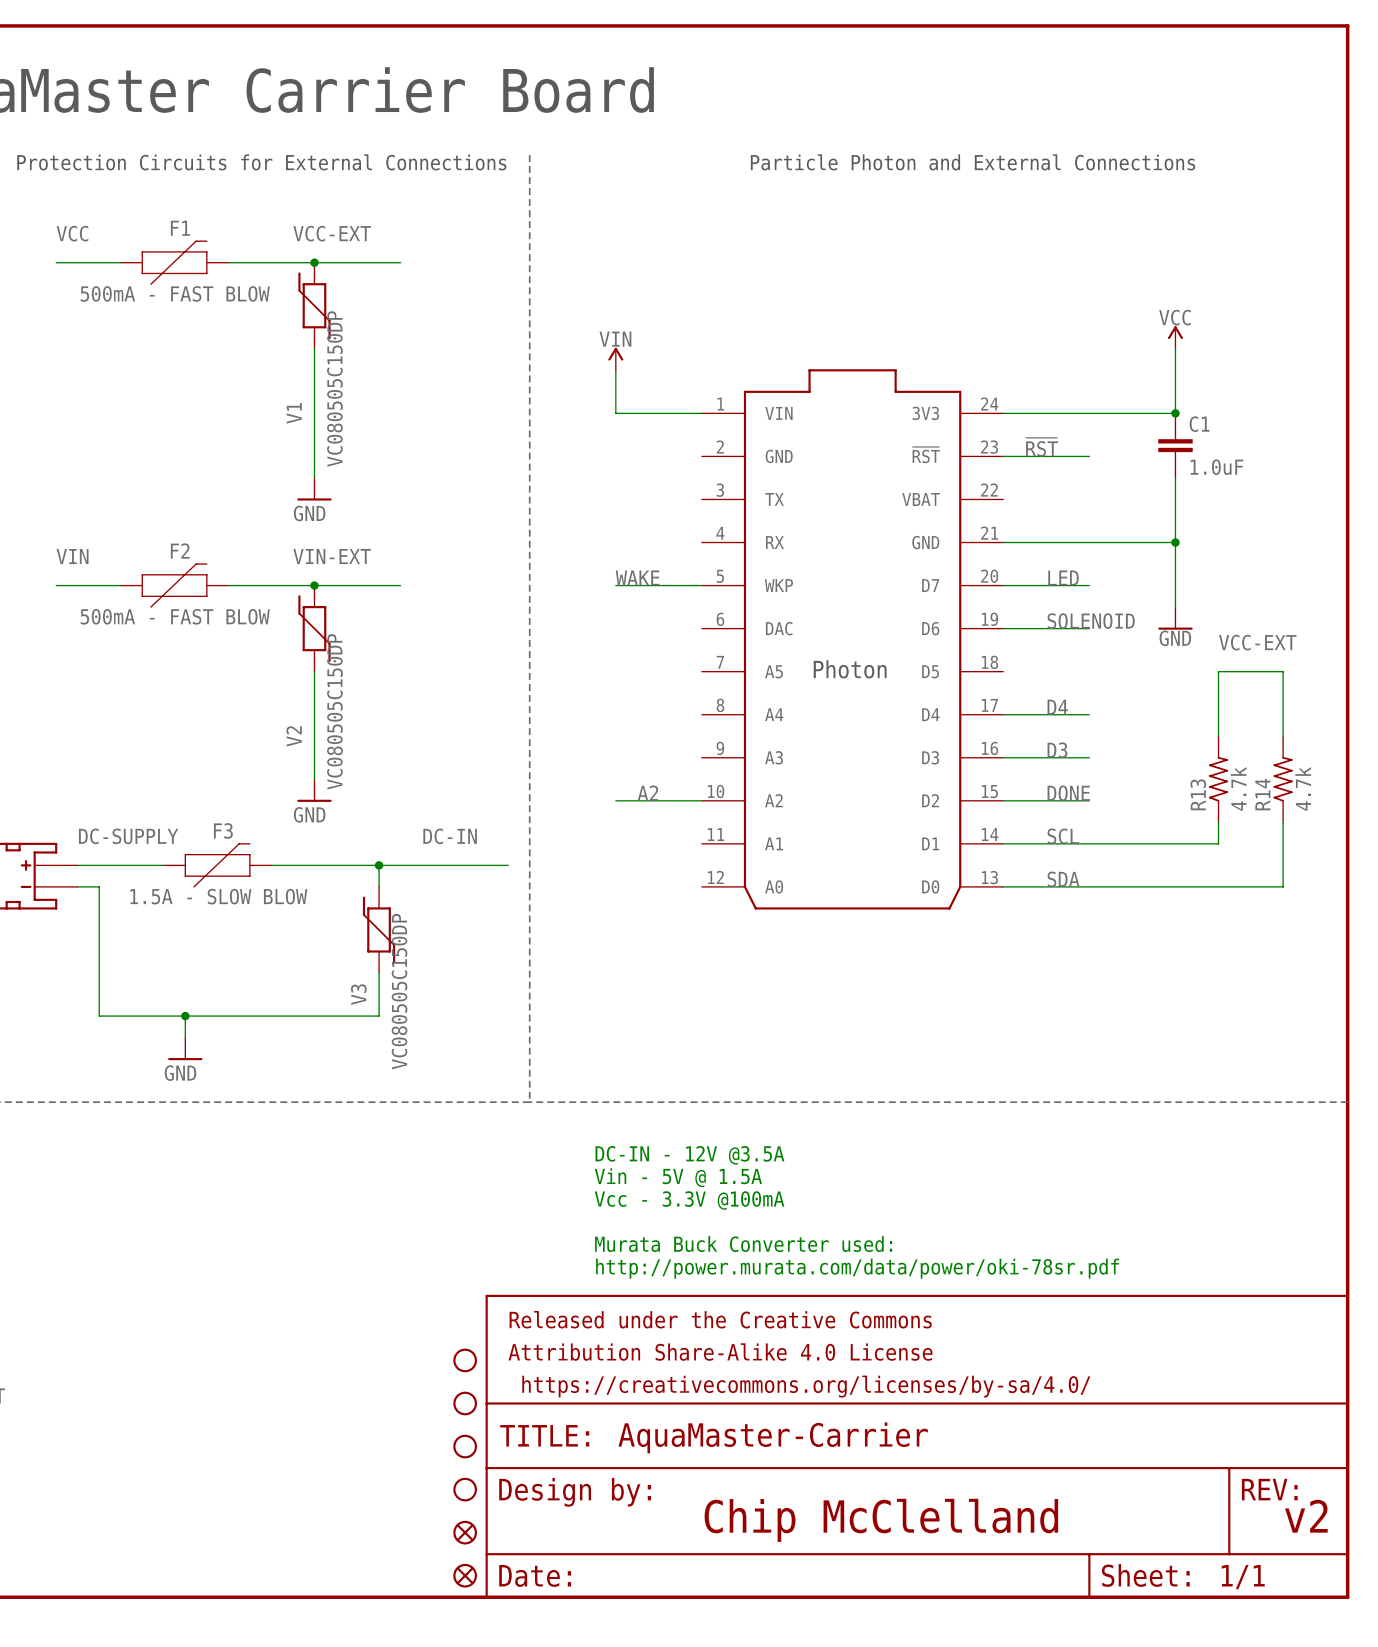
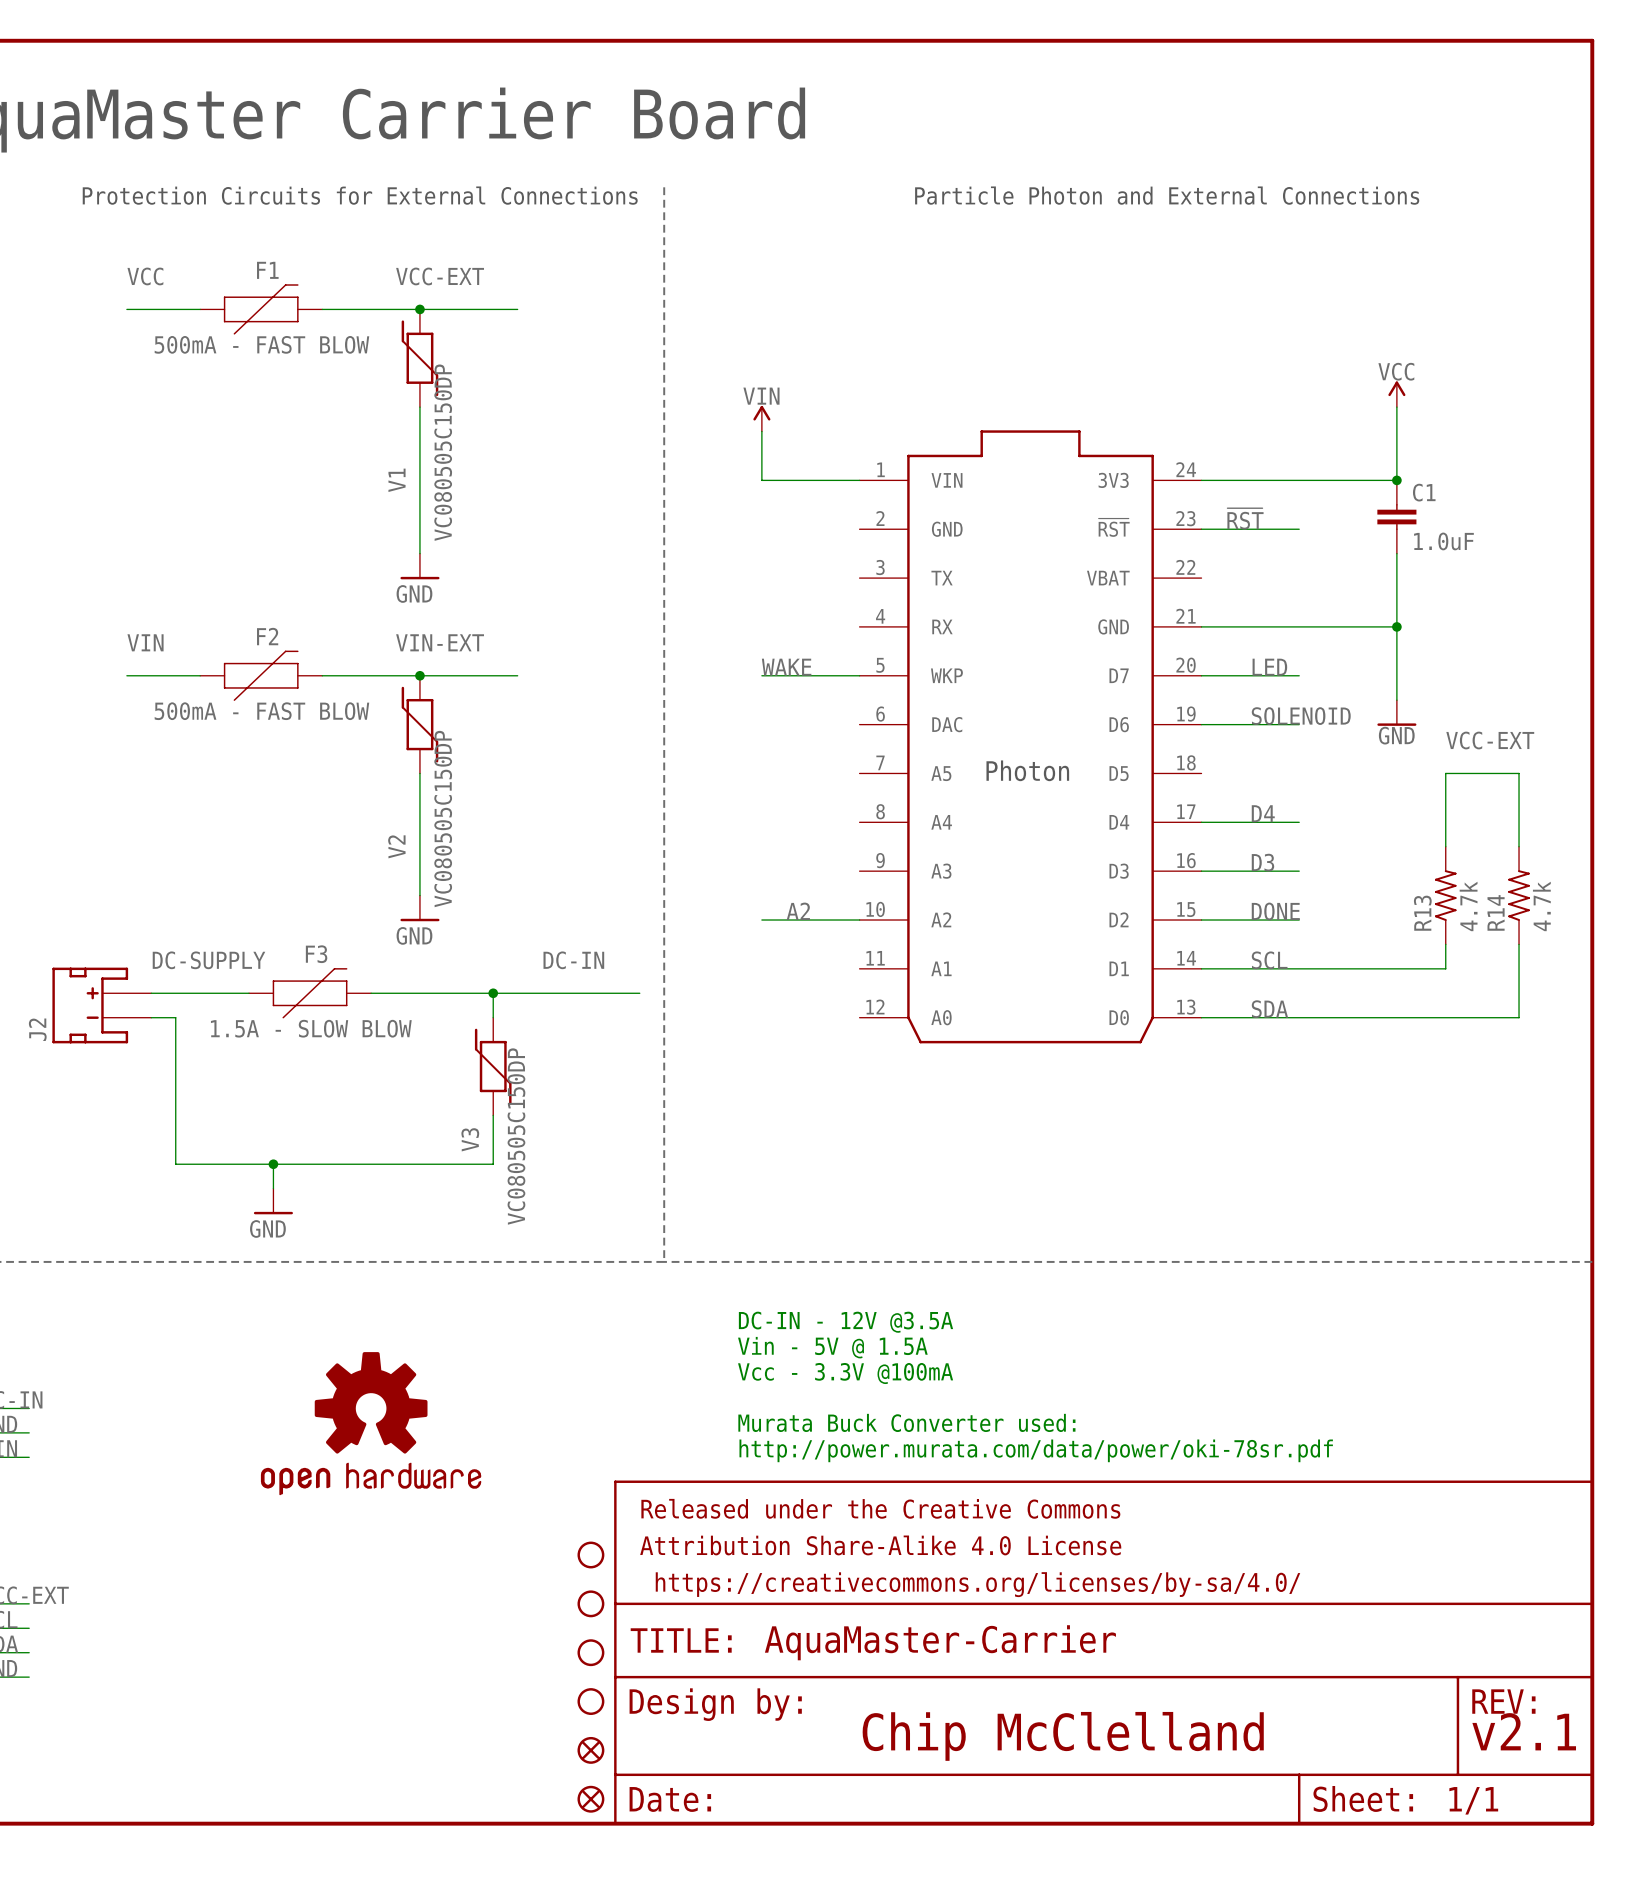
part: none -> (371, 1423)
text: v2 (1306, 1516) -> v2.1 (1524, 1731)

